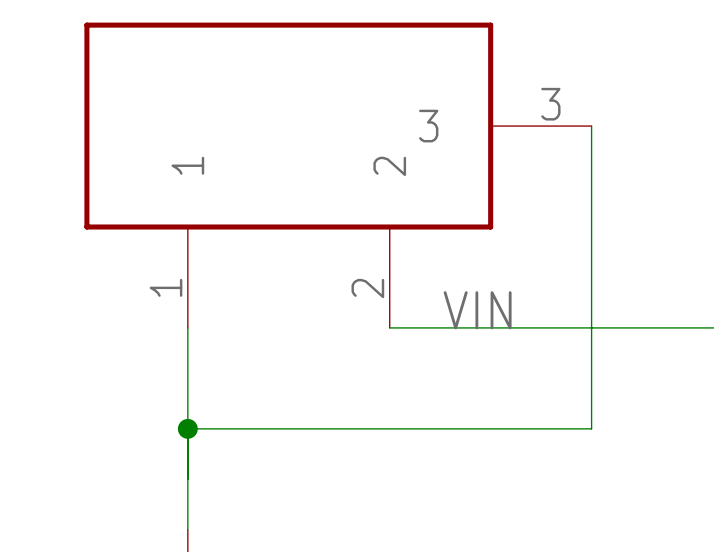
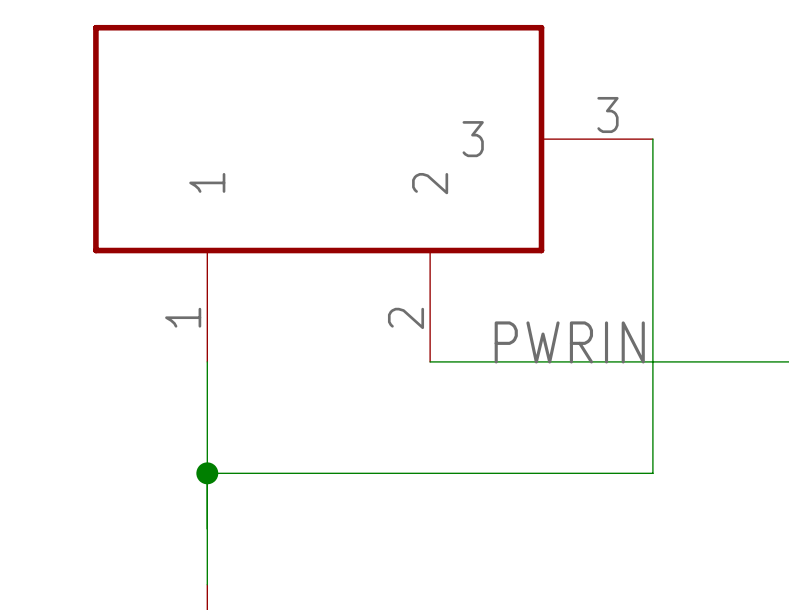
label: VIN (477, 310) -> PWRIN (569, 342)

